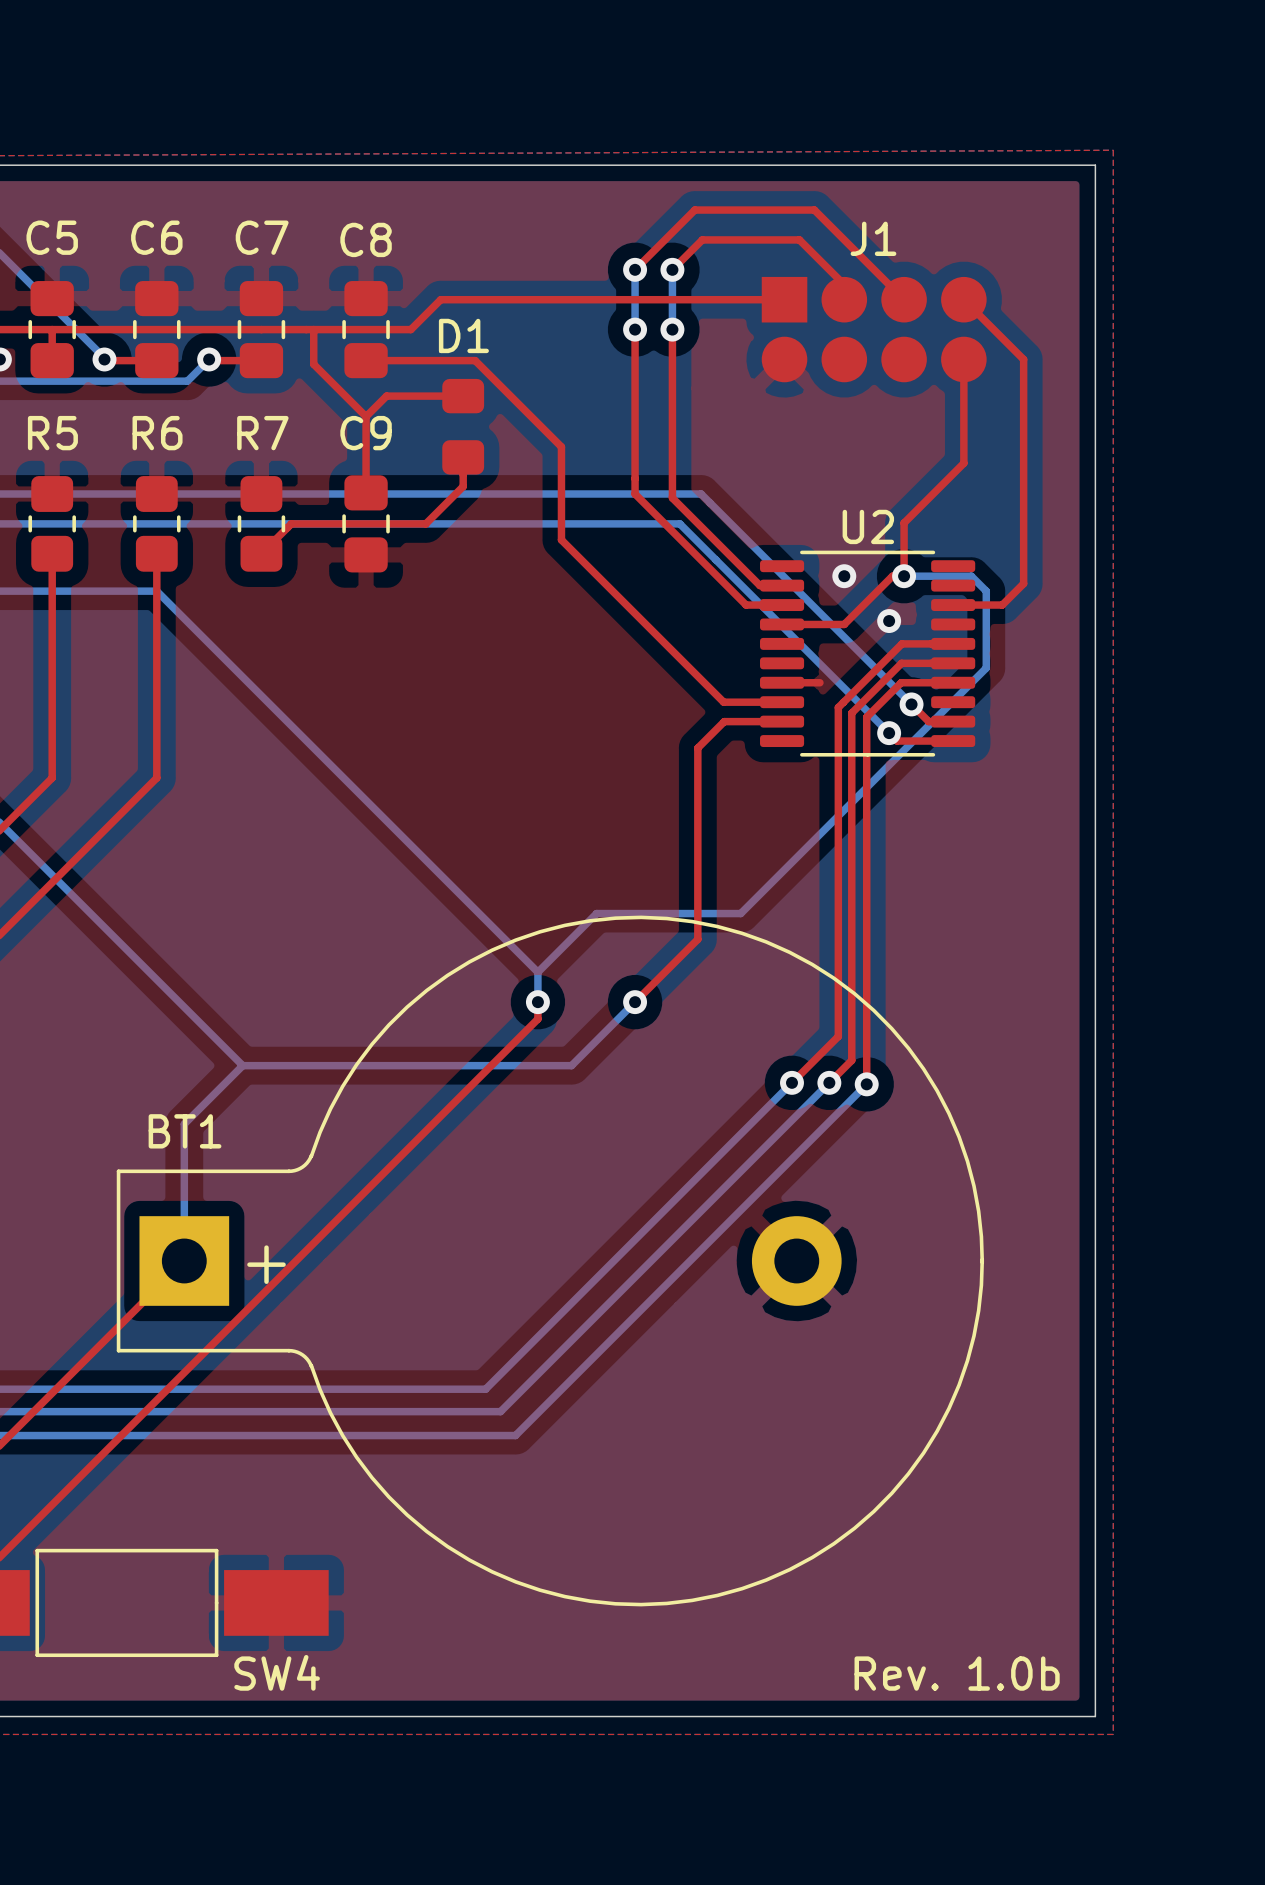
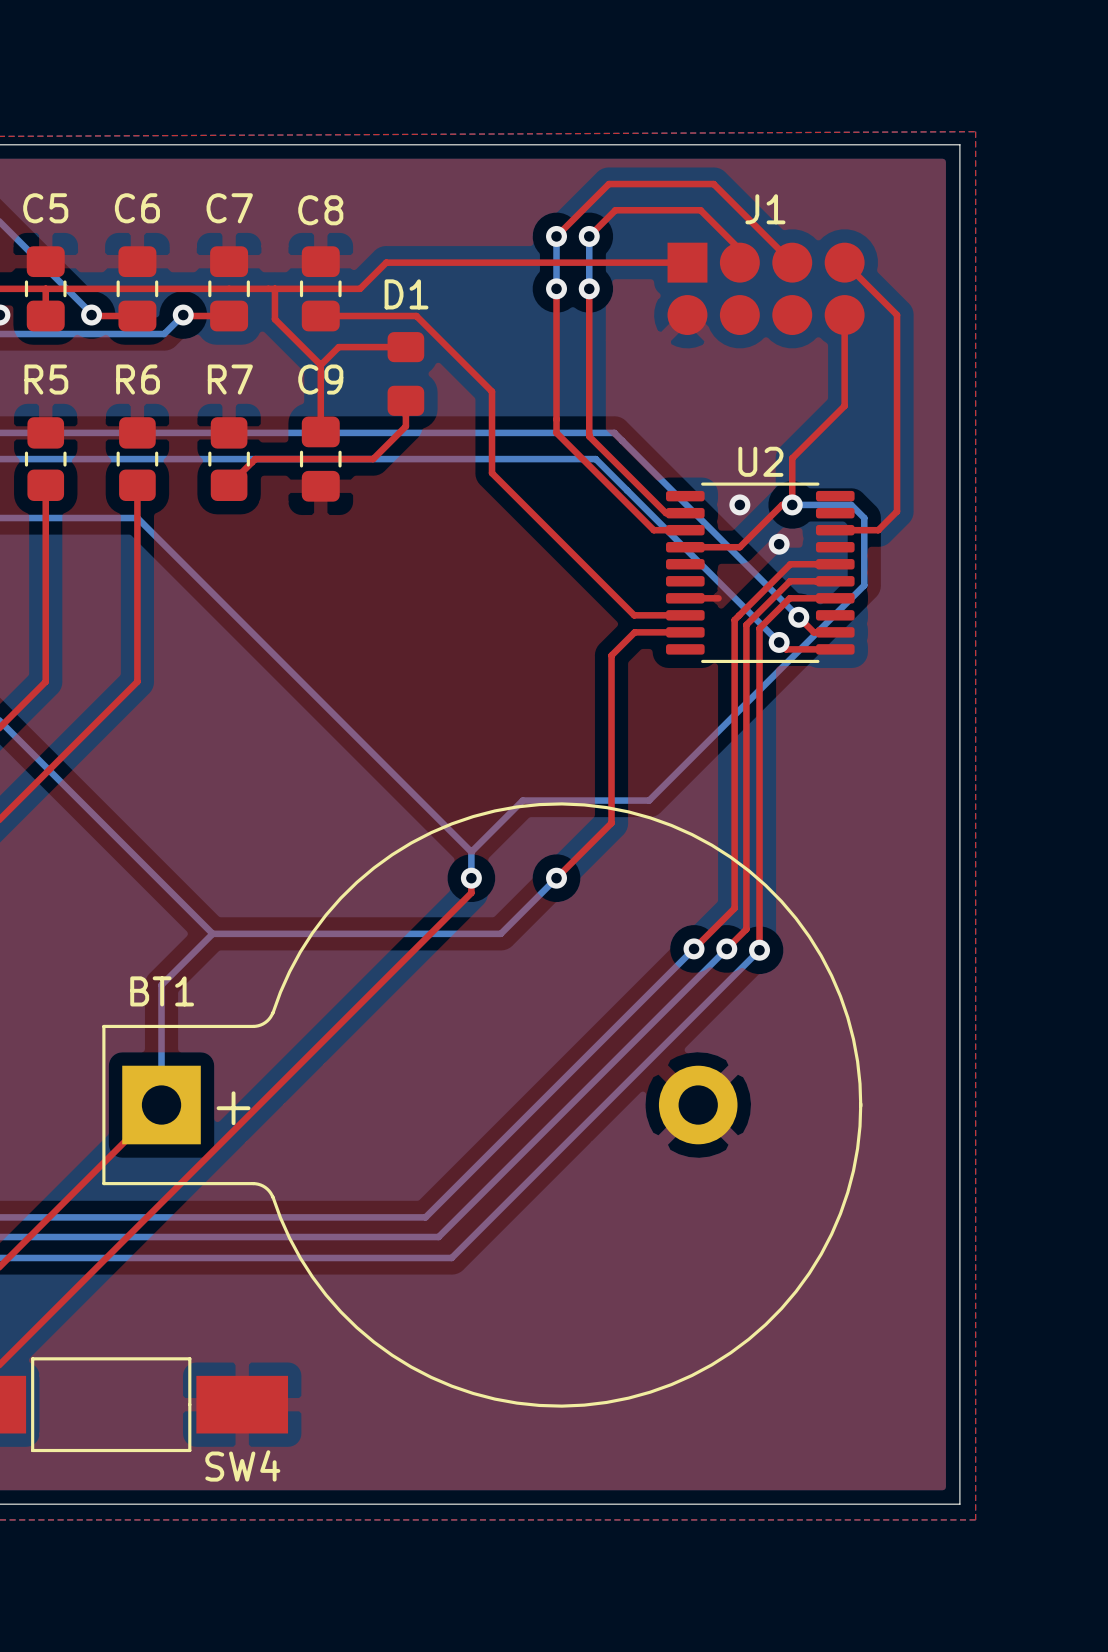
text: Rev. 1.0b (957, 1673) -> none

